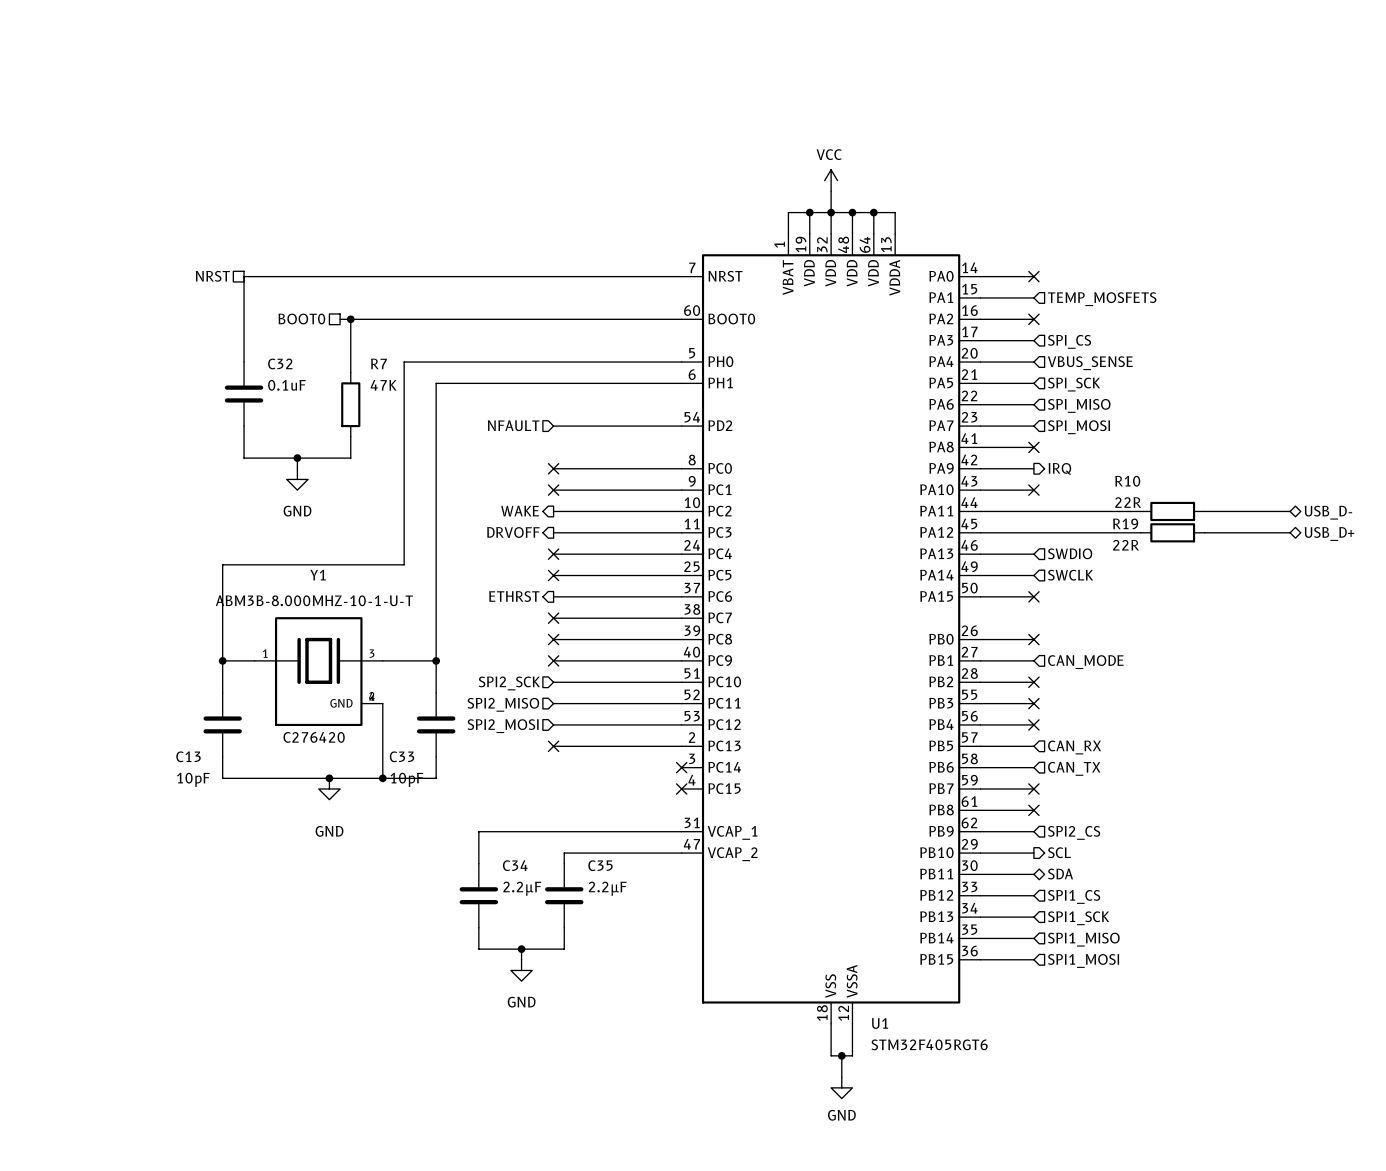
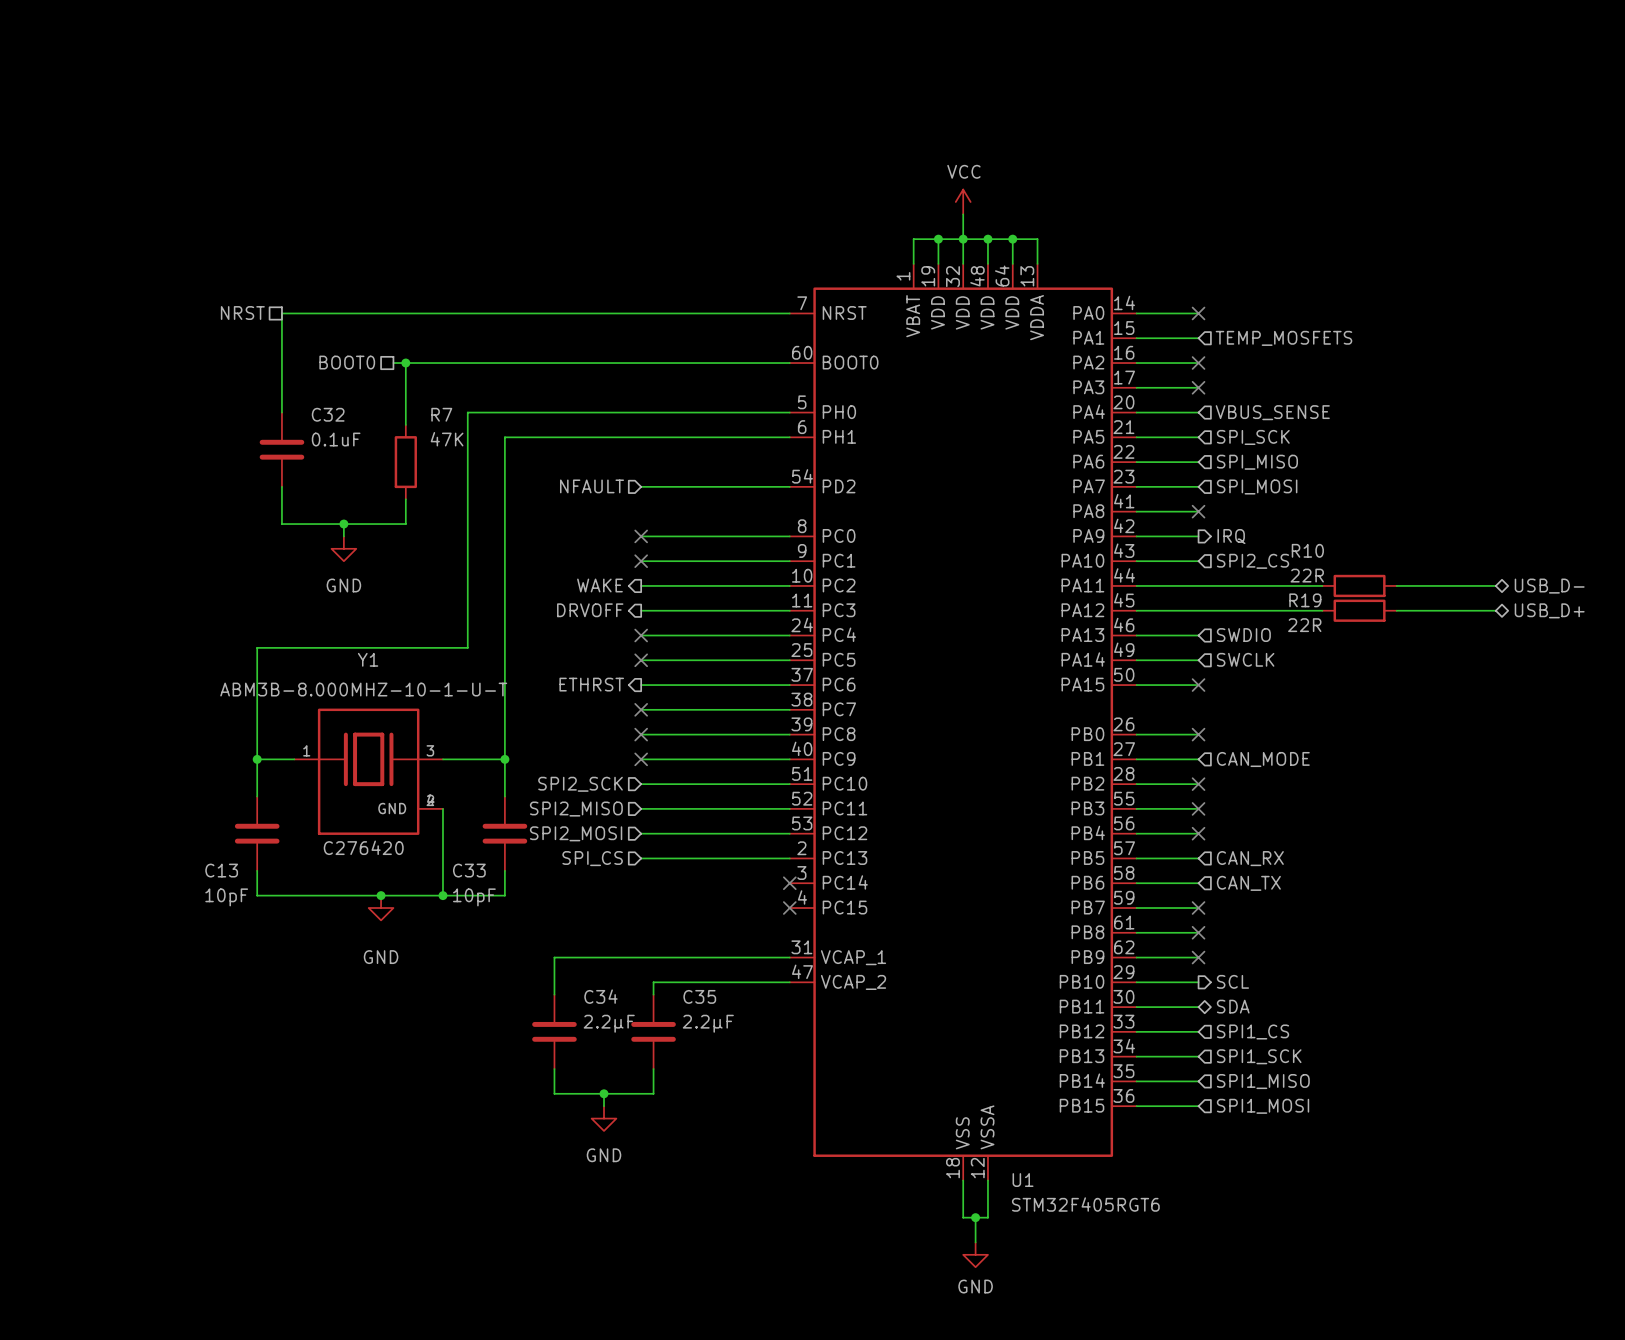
no-connect mark: none -> (1198, 387)
hierarchical label: SPI_CS (1069, 341) -> none
no-connect mark: (1033, 490) -> none
hierarchical label: none -> SPI2_CS (1252, 561)
no-connect mark: (553, 746) -> none
hierarchical label: none -> SPI_CS (592, 858)
no-connect mark: none -> (1198, 957)
hierarchical label: SPI2_CS (1074, 832) -> none

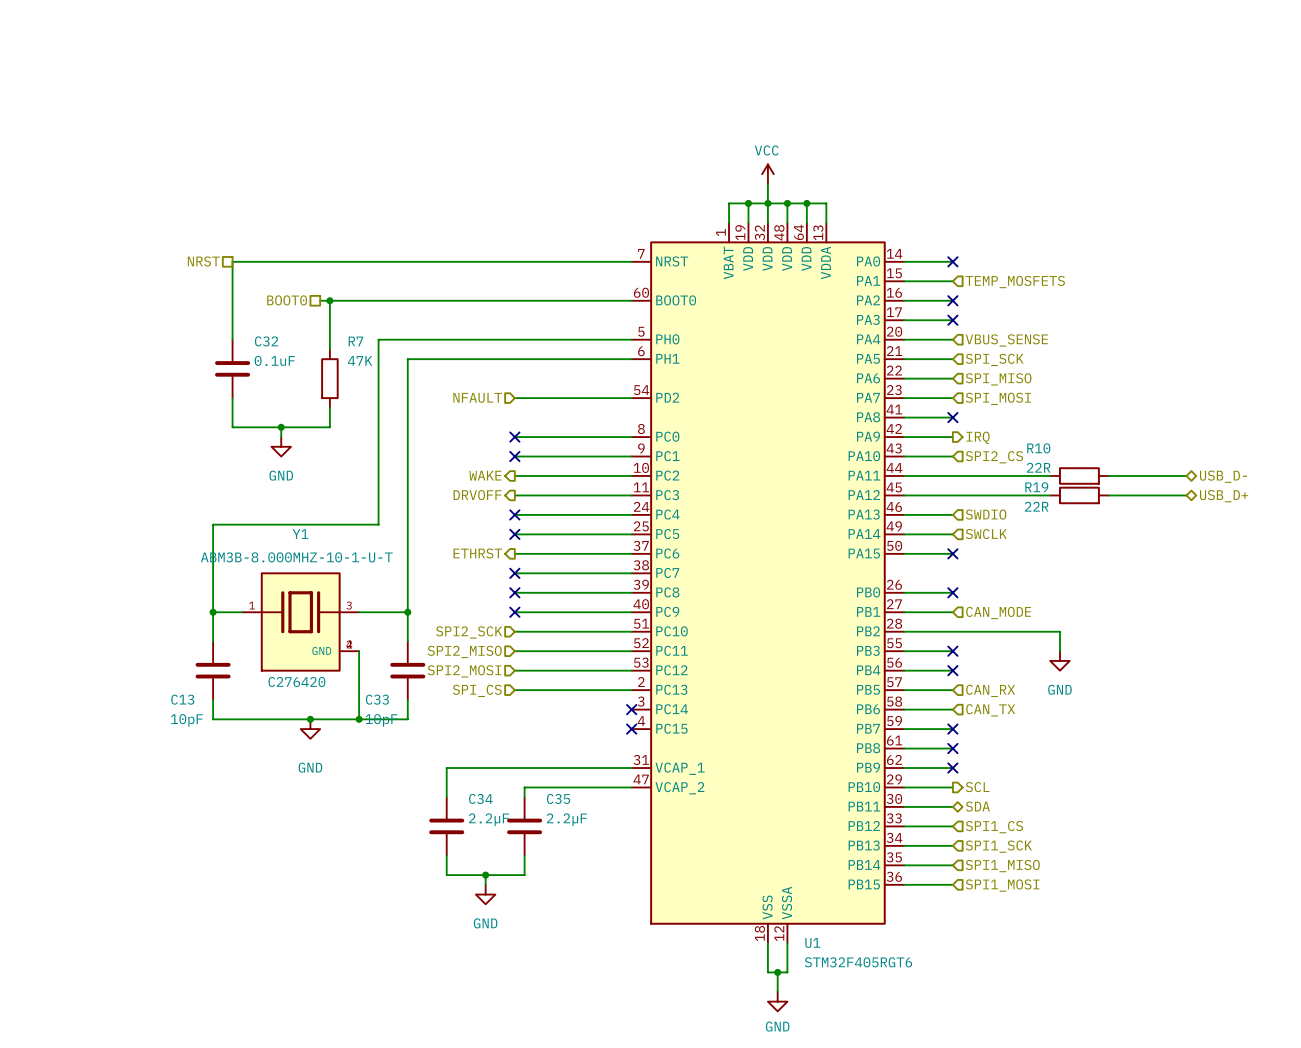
wire: none -> (952, 631) (1059, 631) (1059, 651)
no-connect mark: (1198, 784) -> none
power symbol: none -> GND (1059, 660)

